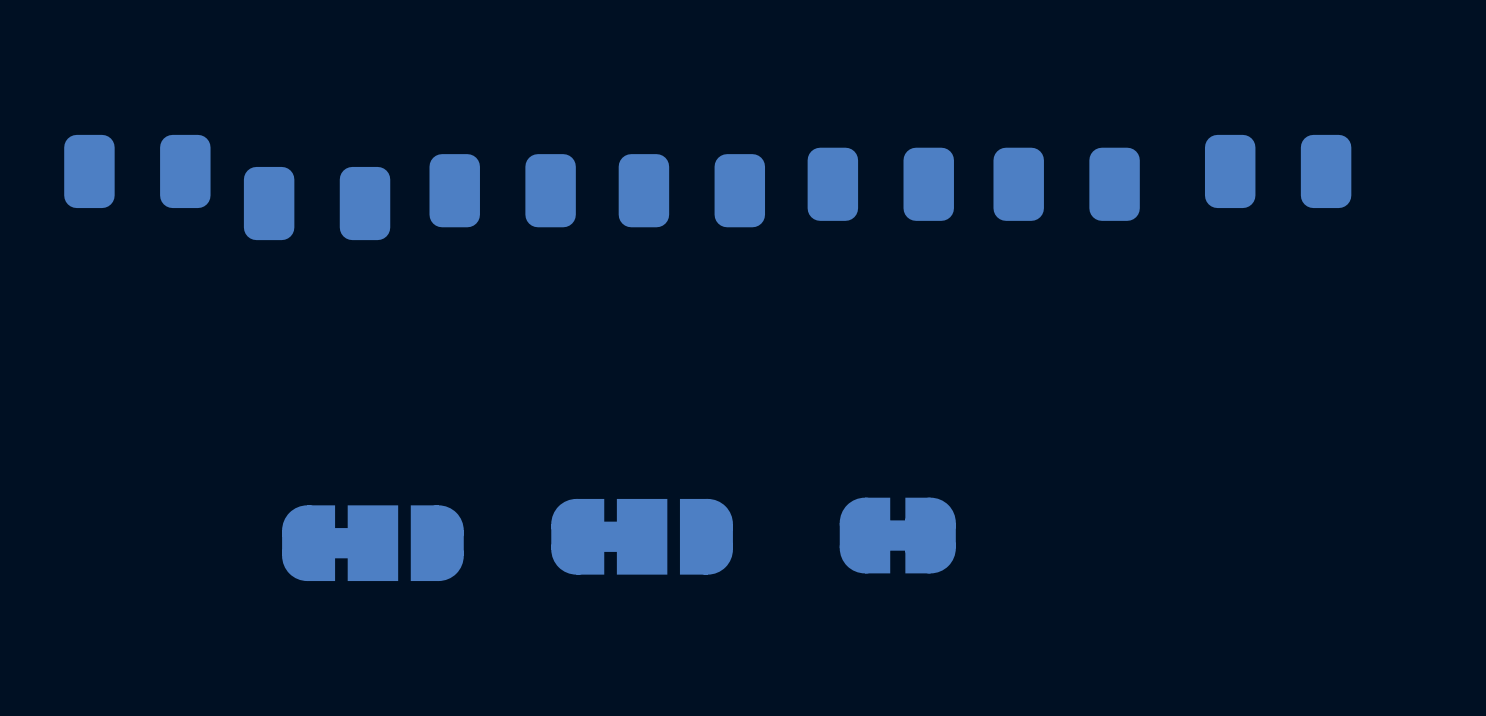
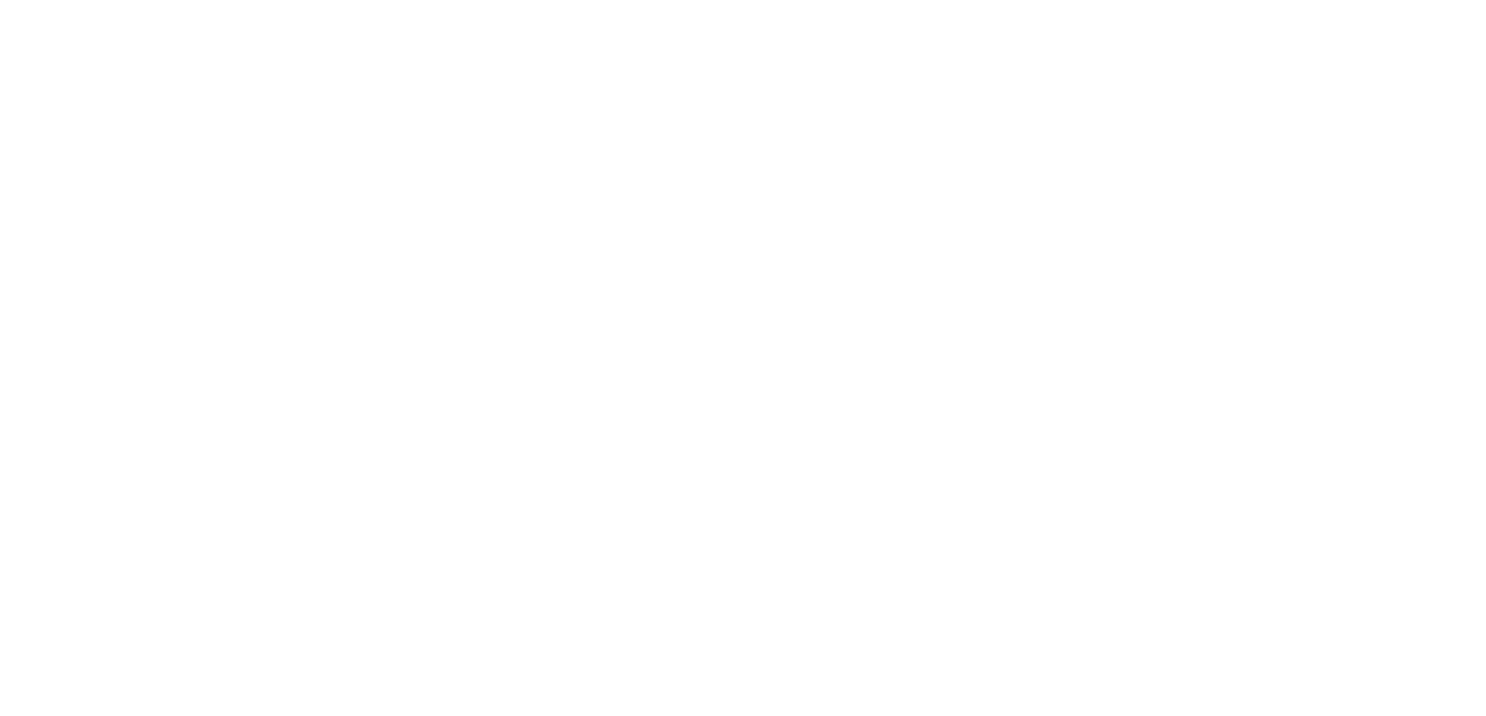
part: (137, 171) -> none
part: (1278, 171) -> none
part: (880, 184) -> none
part: (1066, 184) -> none
part: (502, 190) -> none
part: (691, 190) -> none
part: (317, 203) -> none
part: (897, 535) -> none
part: (642, 536) -> none
part: (372, 543) -> none

